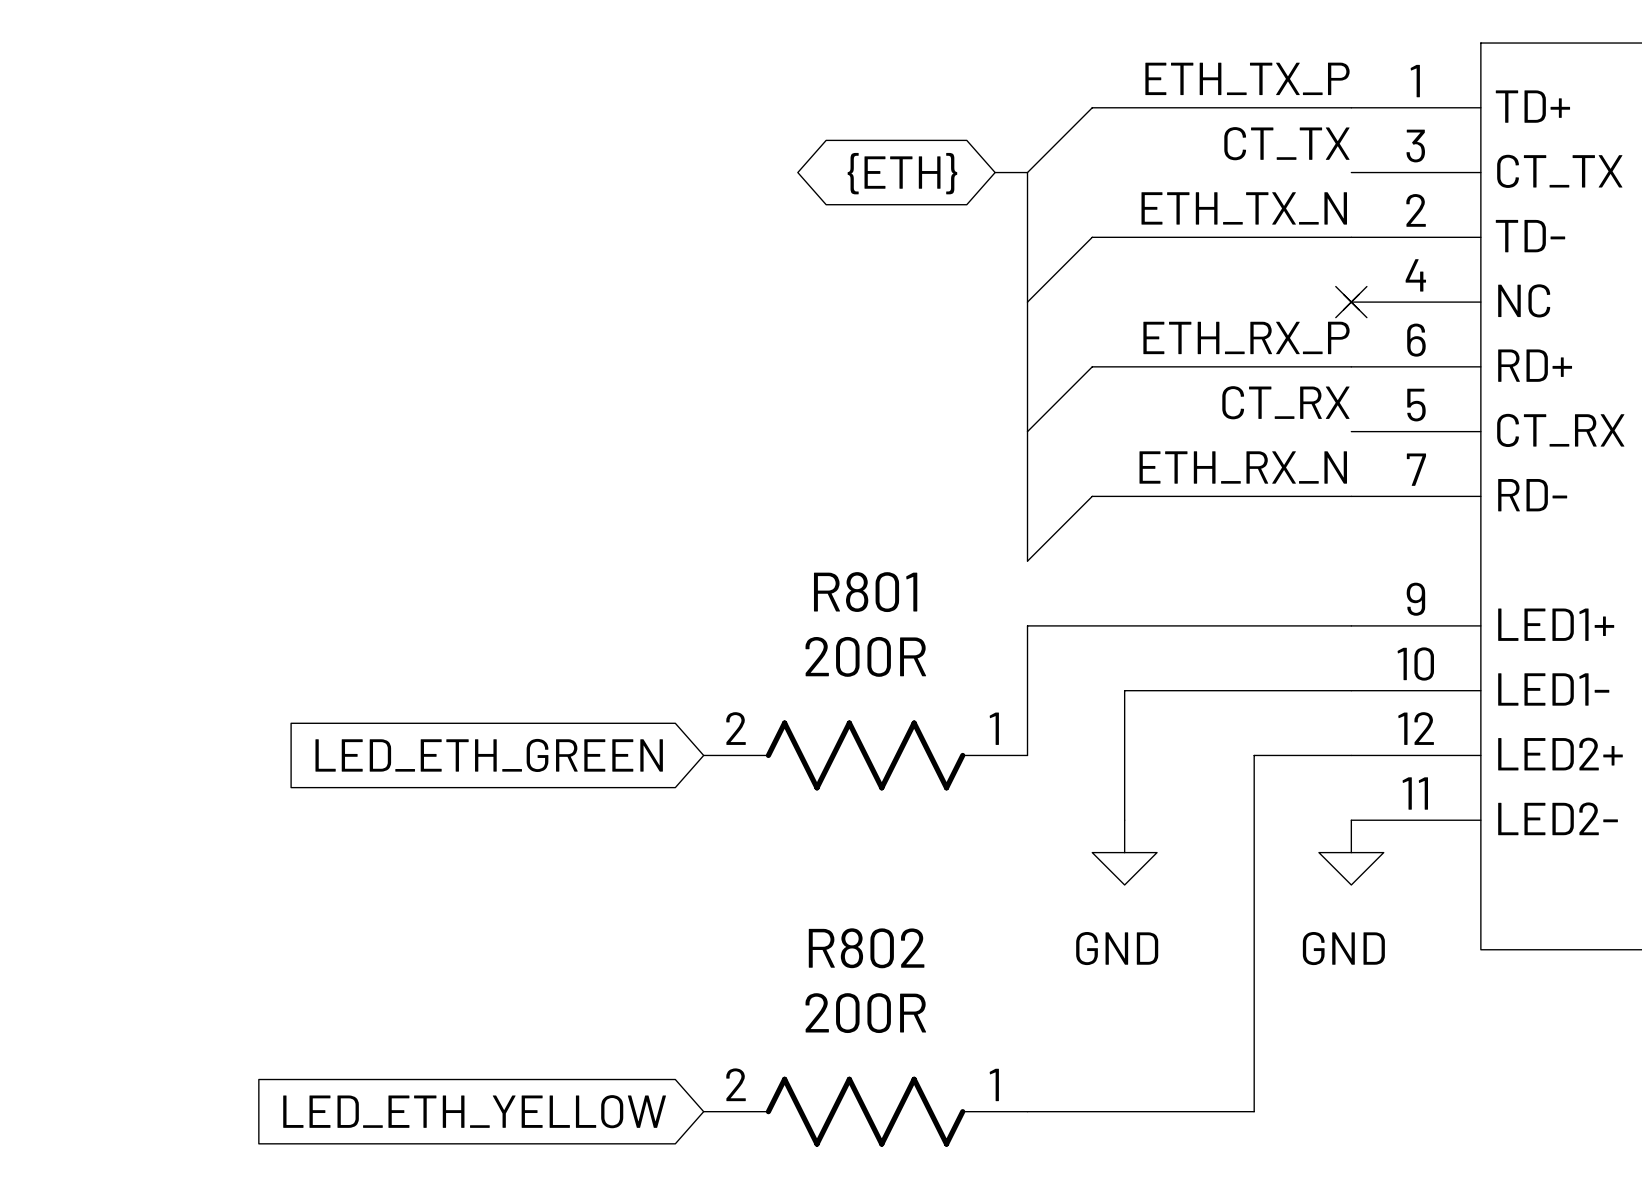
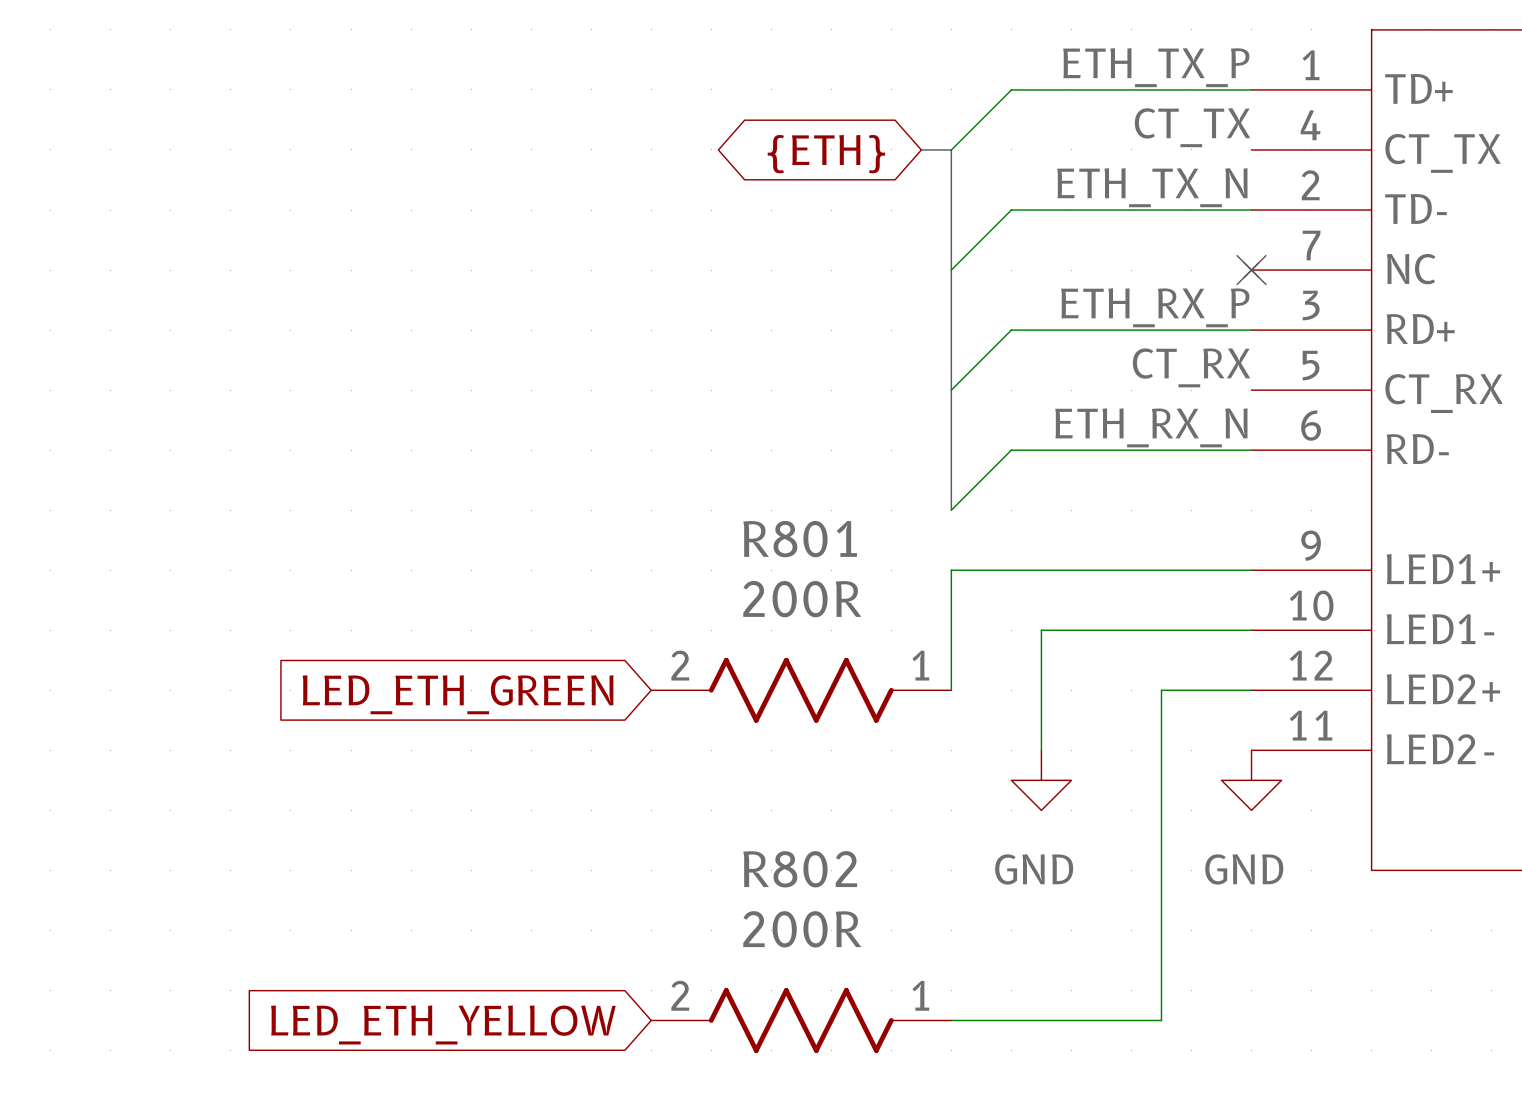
part pin number: 3 (1415, 146) -> 4 (1310, 125)
part pin number: 4 (1415, 275) -> 7 (1311, 245)
part pin number: 6 (1416, 340) -> 3 (1311, 305)
part pin number: 7 (1416, 469) -> 6 (1311, 425)

